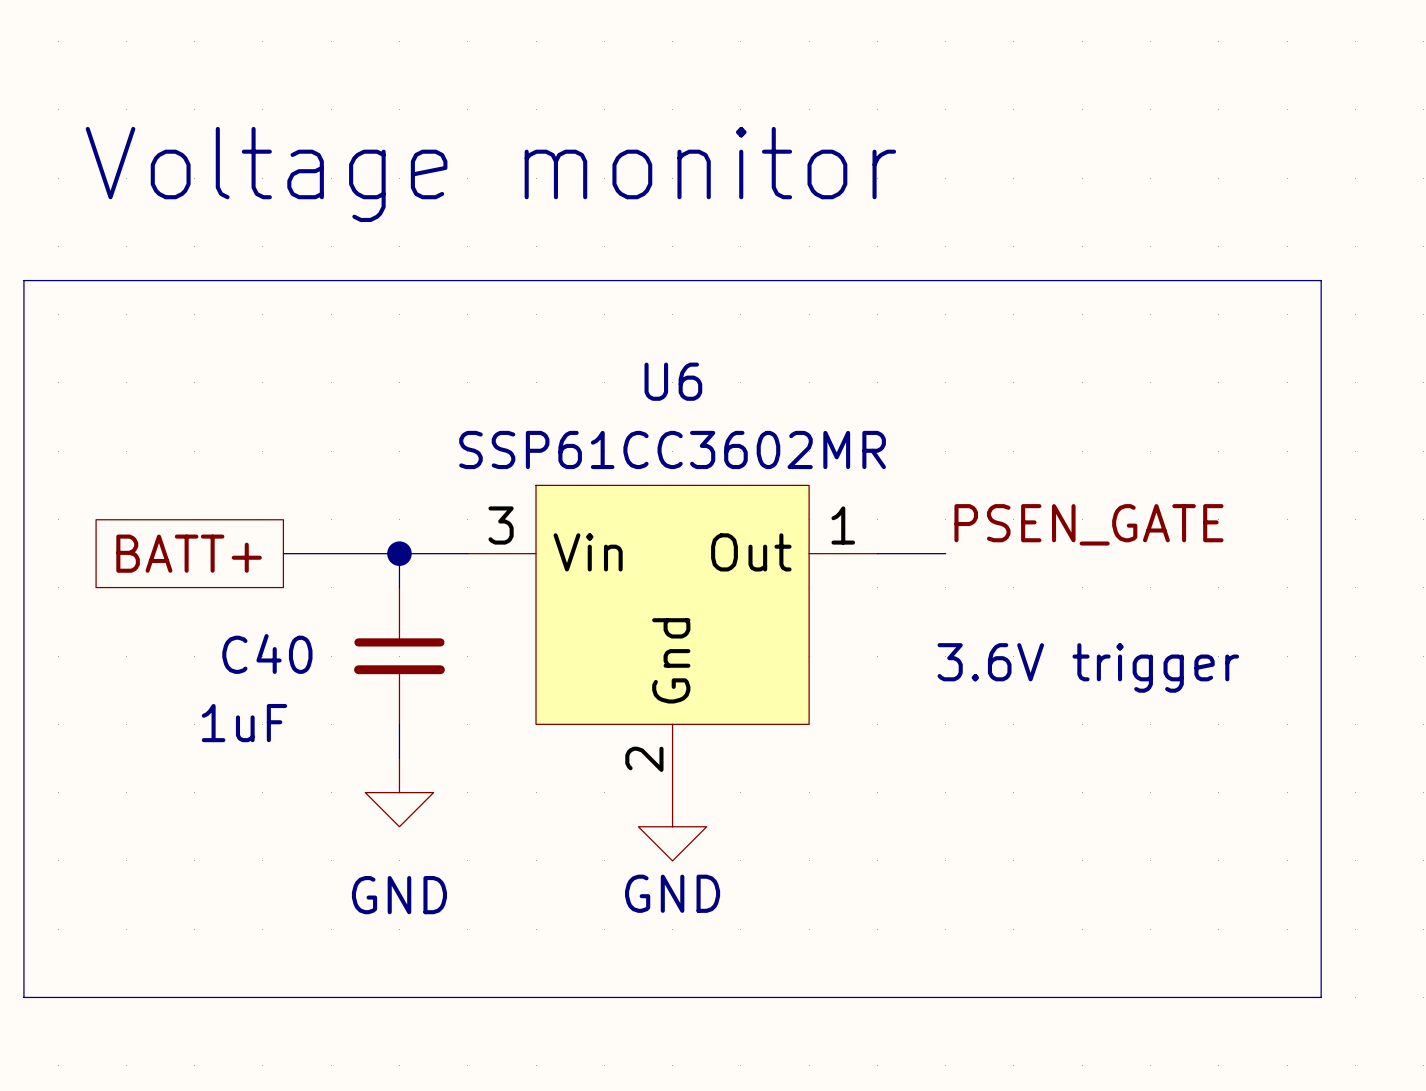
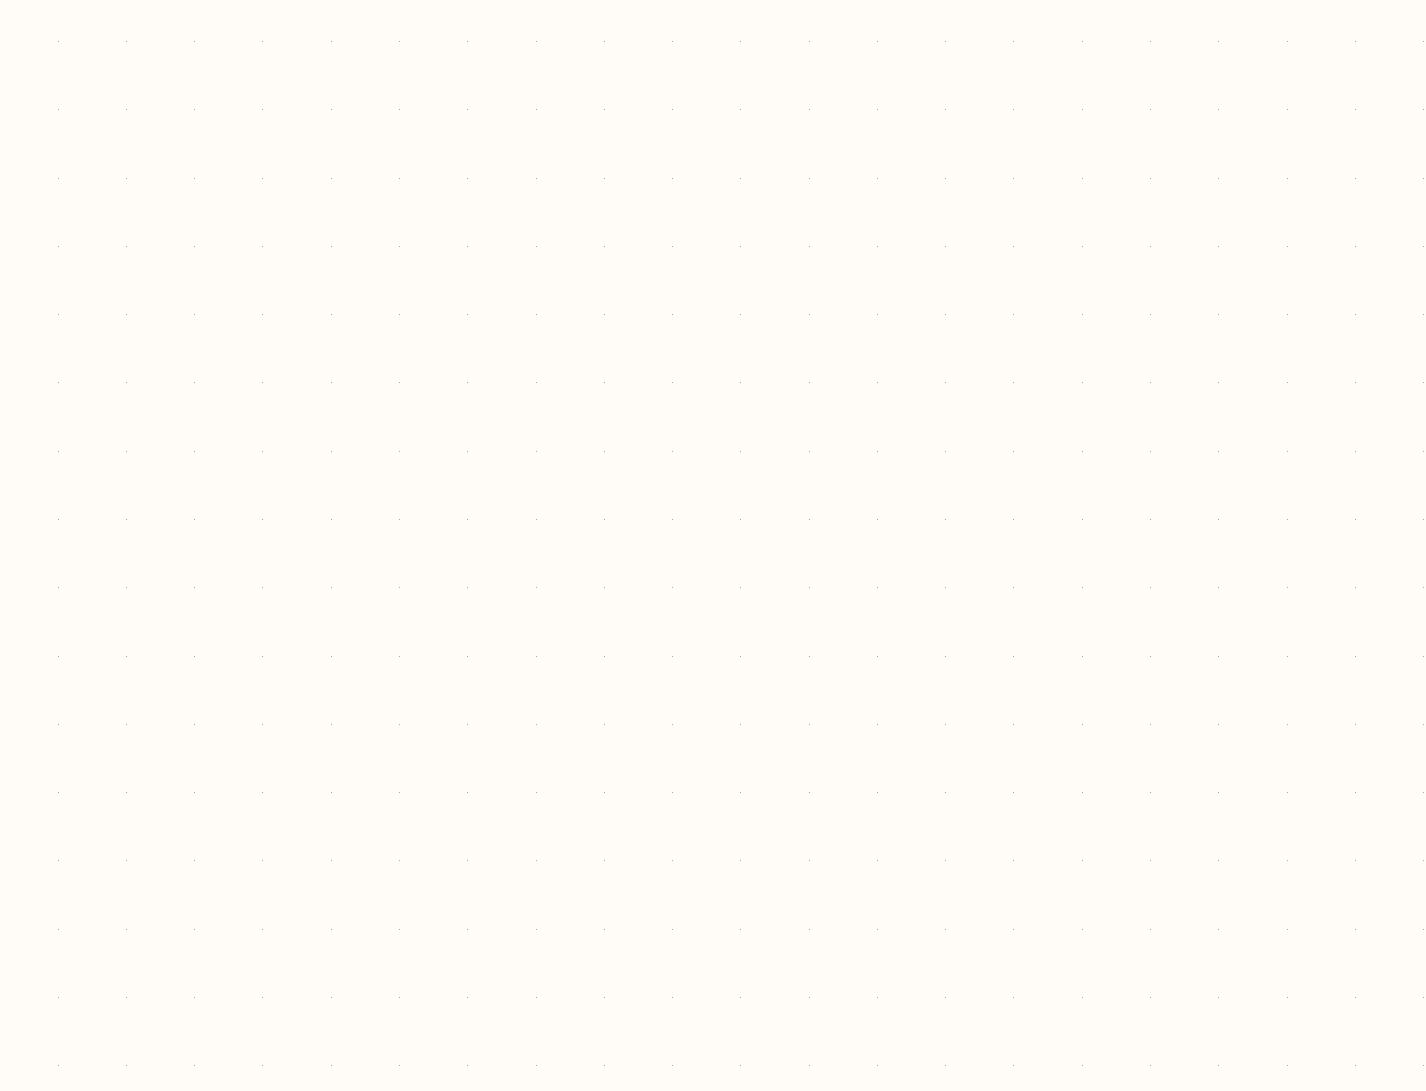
text: Voltage monitor (490, 174) -> none
line: (23, 280) (1321, 280) (1321, 997) (23, 997) (23, 280) -> none
label: PSEN_GATE (1088, 524) -> none
global label: BATT+ (189, 553) -> none
wire: (283, 553) (467, 553) -> none
wire: (399, 553) (399, 587) -> none
junction: (399, 553) -> none
wire: (877, 553) (945, 553) -> none
U6: SSP61CC3602MR (672, 639) -> none
C40: 1uF (399, 656) -> none
text: 3.6V trigger (1088, 667) -> none
wire: (399, 724) (399, 758) -> none
power symbol: GND (399, 792) -> none
power symbol: GND (672, 826) -> none

